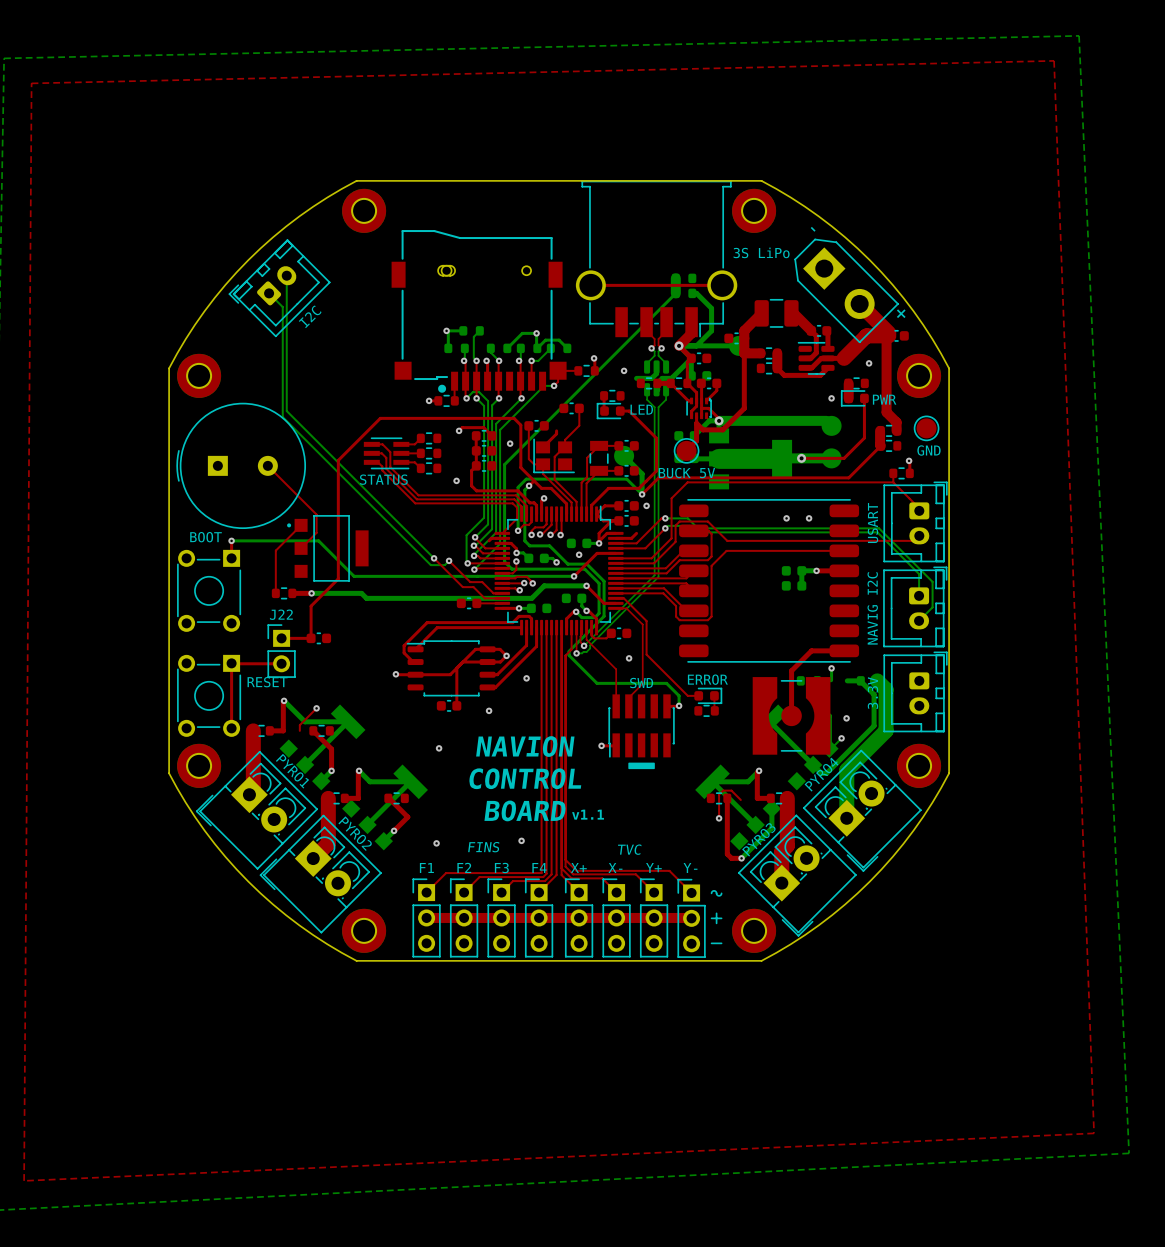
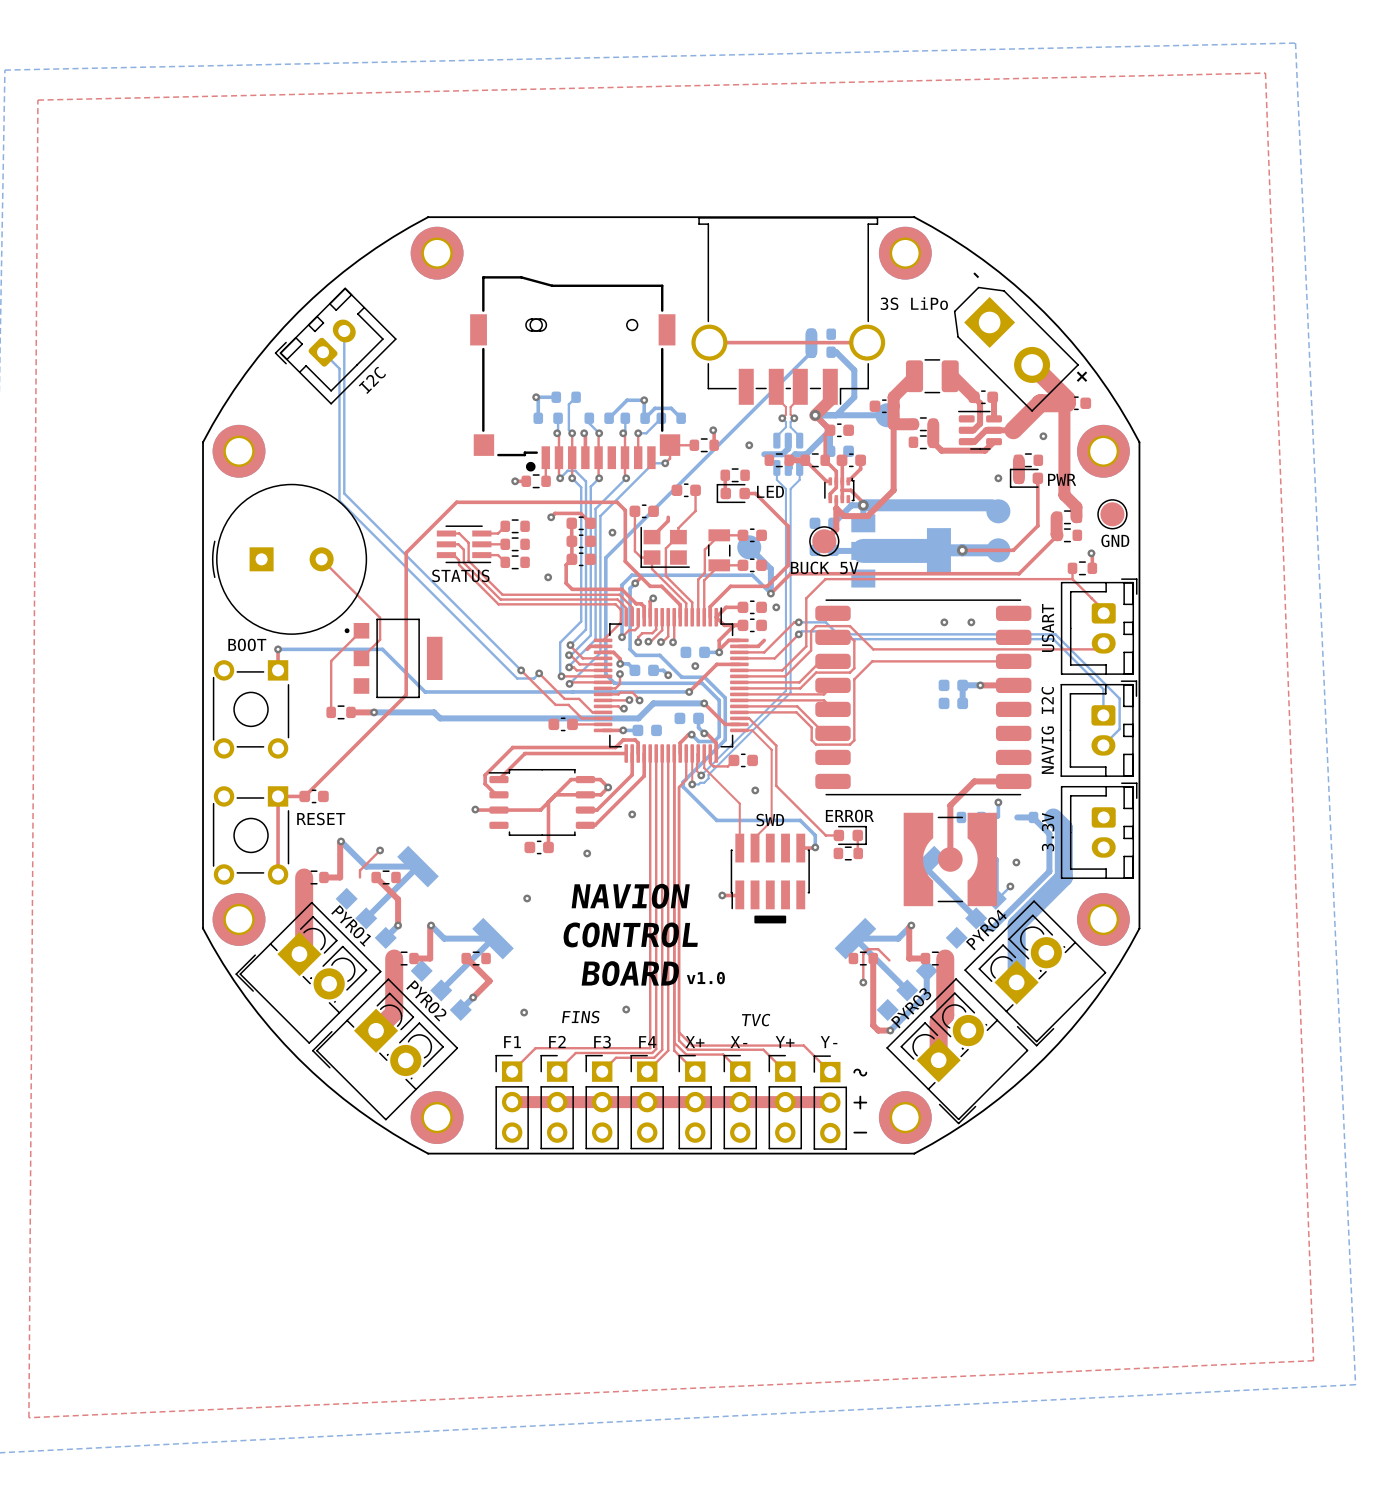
top track: (311, 606) (311, 638) (281, 638) -> (373, 727) (304, 796) (278, 796)
part position: (318, 638) -> (314, 796)
J22: (281, 651) -> none
top track: (231, 663) (281, 663) -> none
text: v1.1 (588, 814) -> v1.0 (705, 978)

